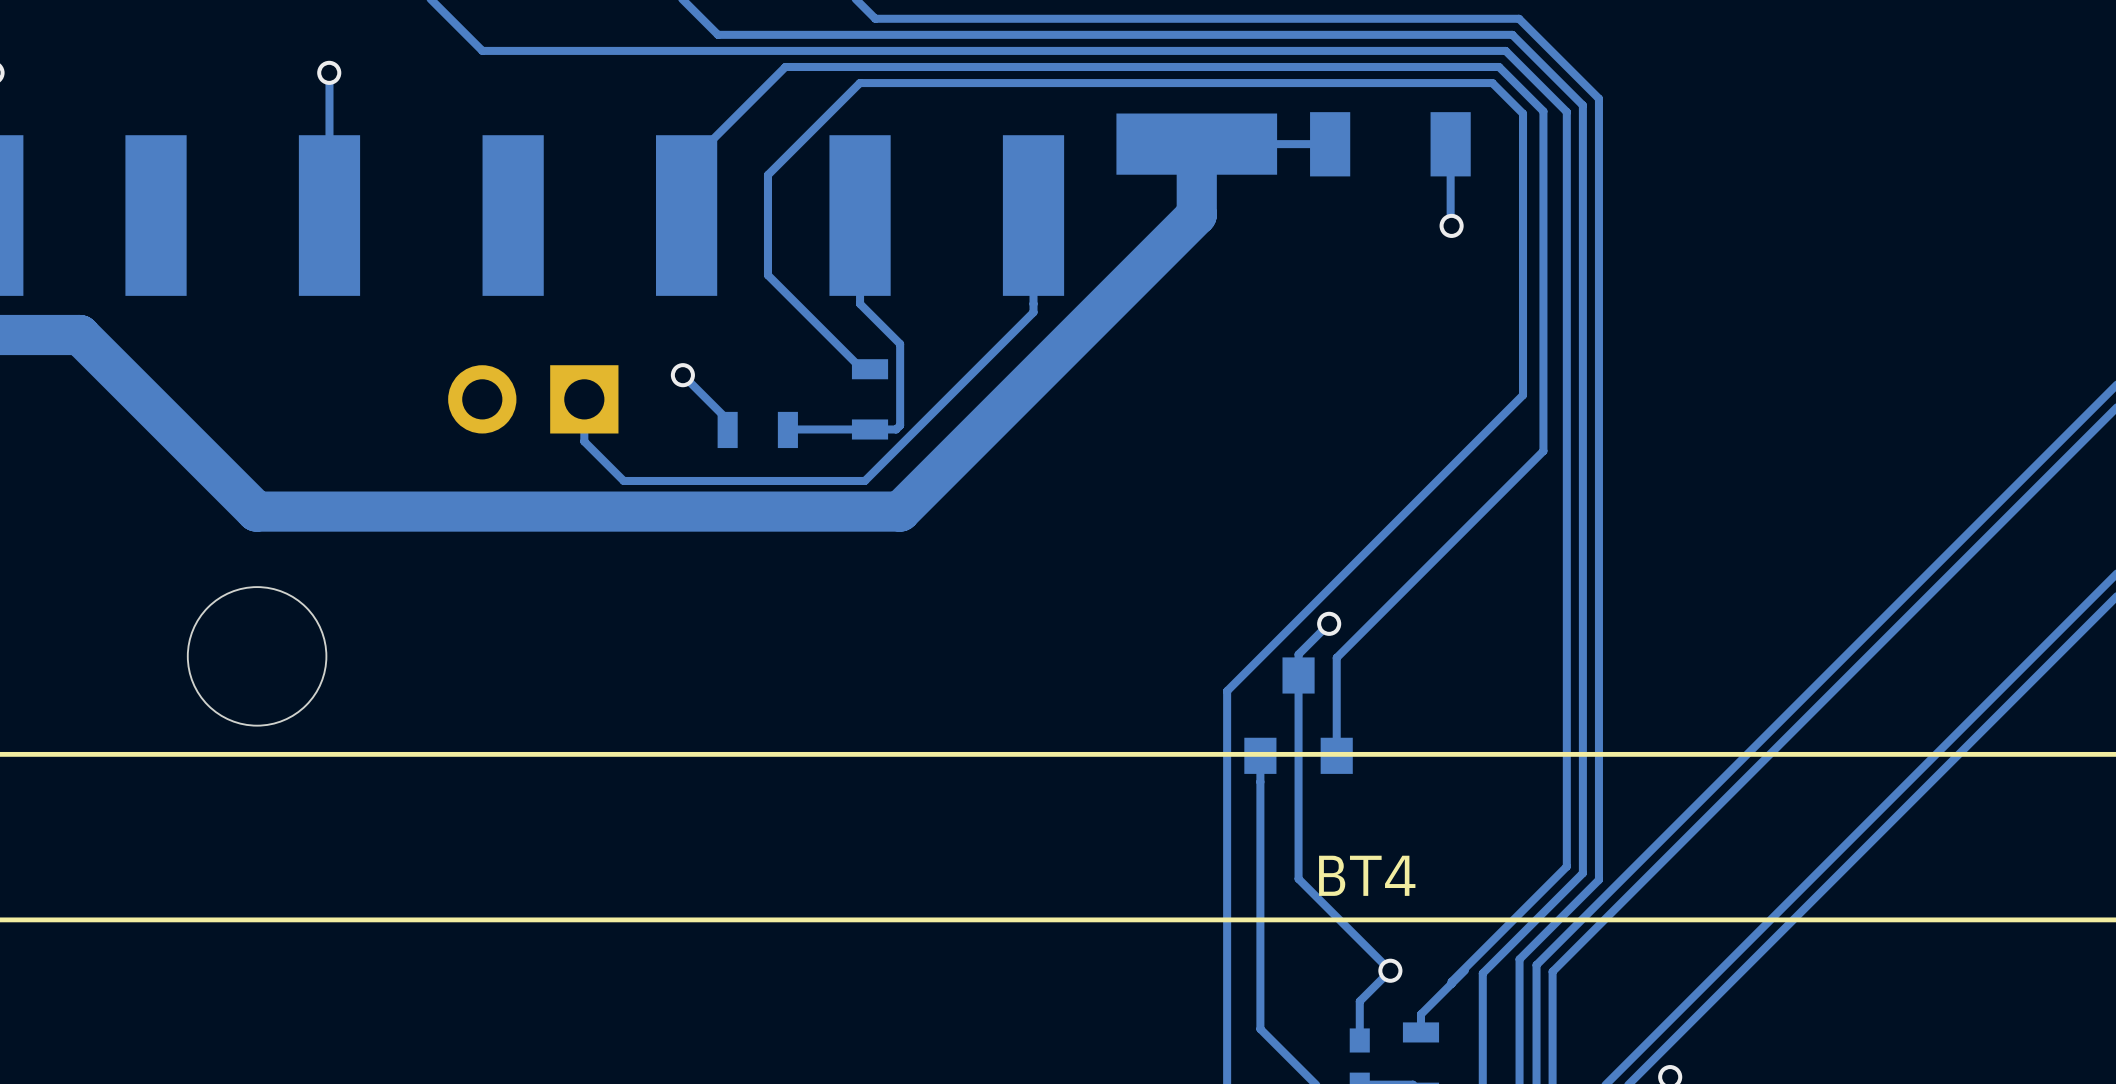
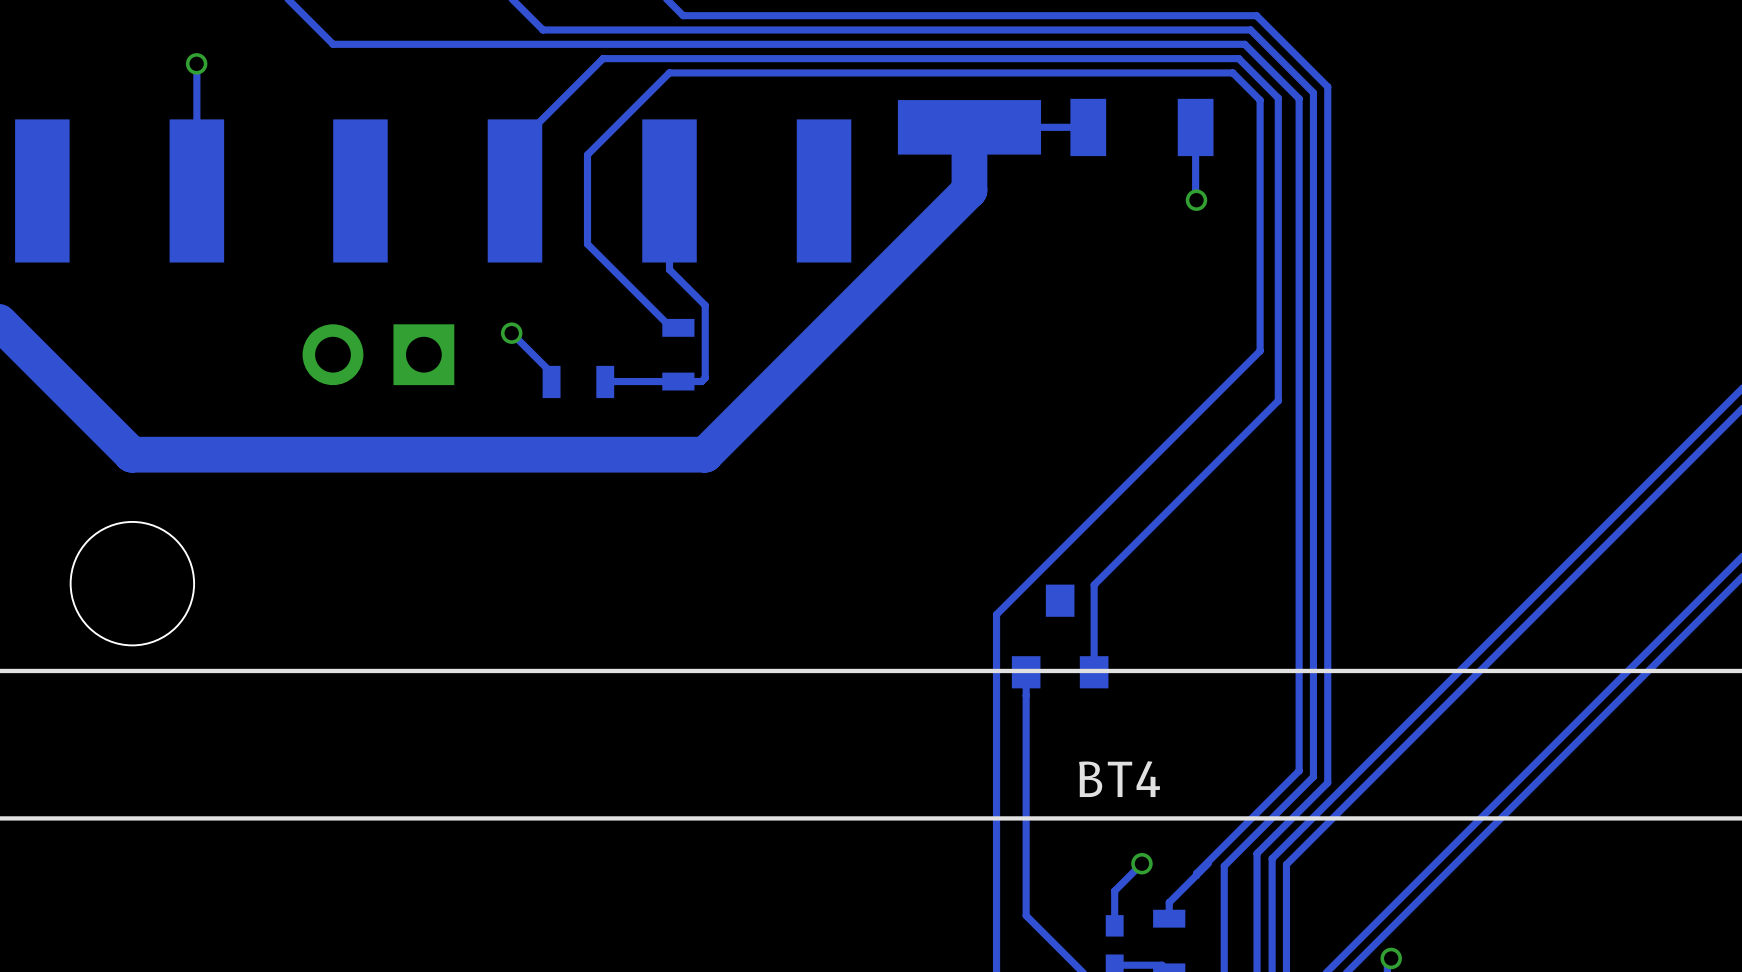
bottom track: (1033, 265) (1033, 312) (864, 480) (623, 480) (584, 441) (584, 399) -> none
bottom track: (1329, 623) (1298, 654) (1298, 878) (1390, 970) -> none
via: (1329, 623) -> none

